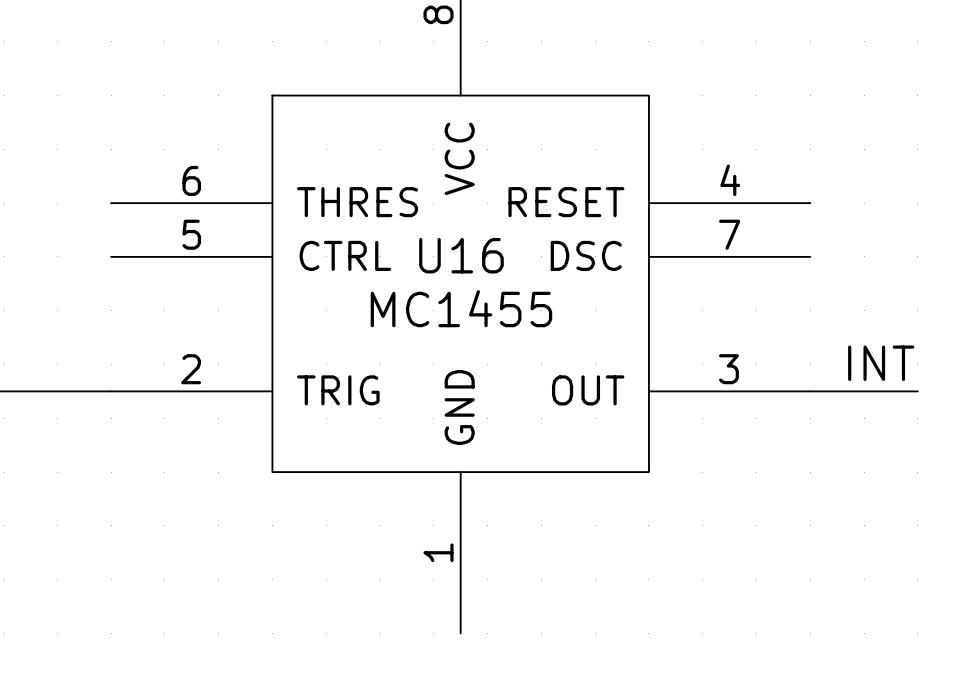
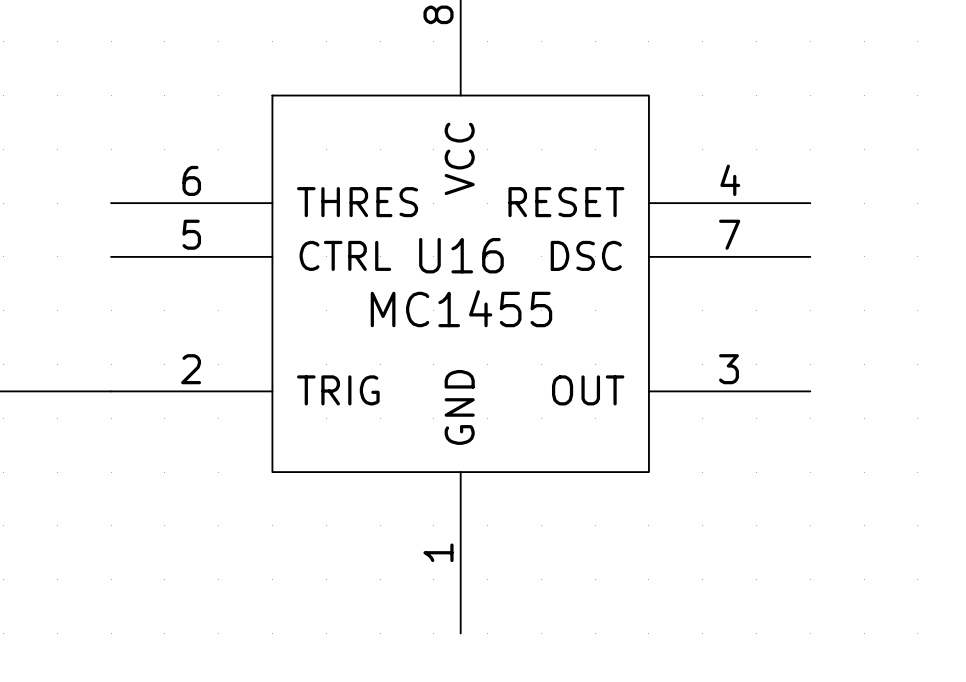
label: INT (881, 363) -> none
wire: (810, 391) (917, 391) -> none

